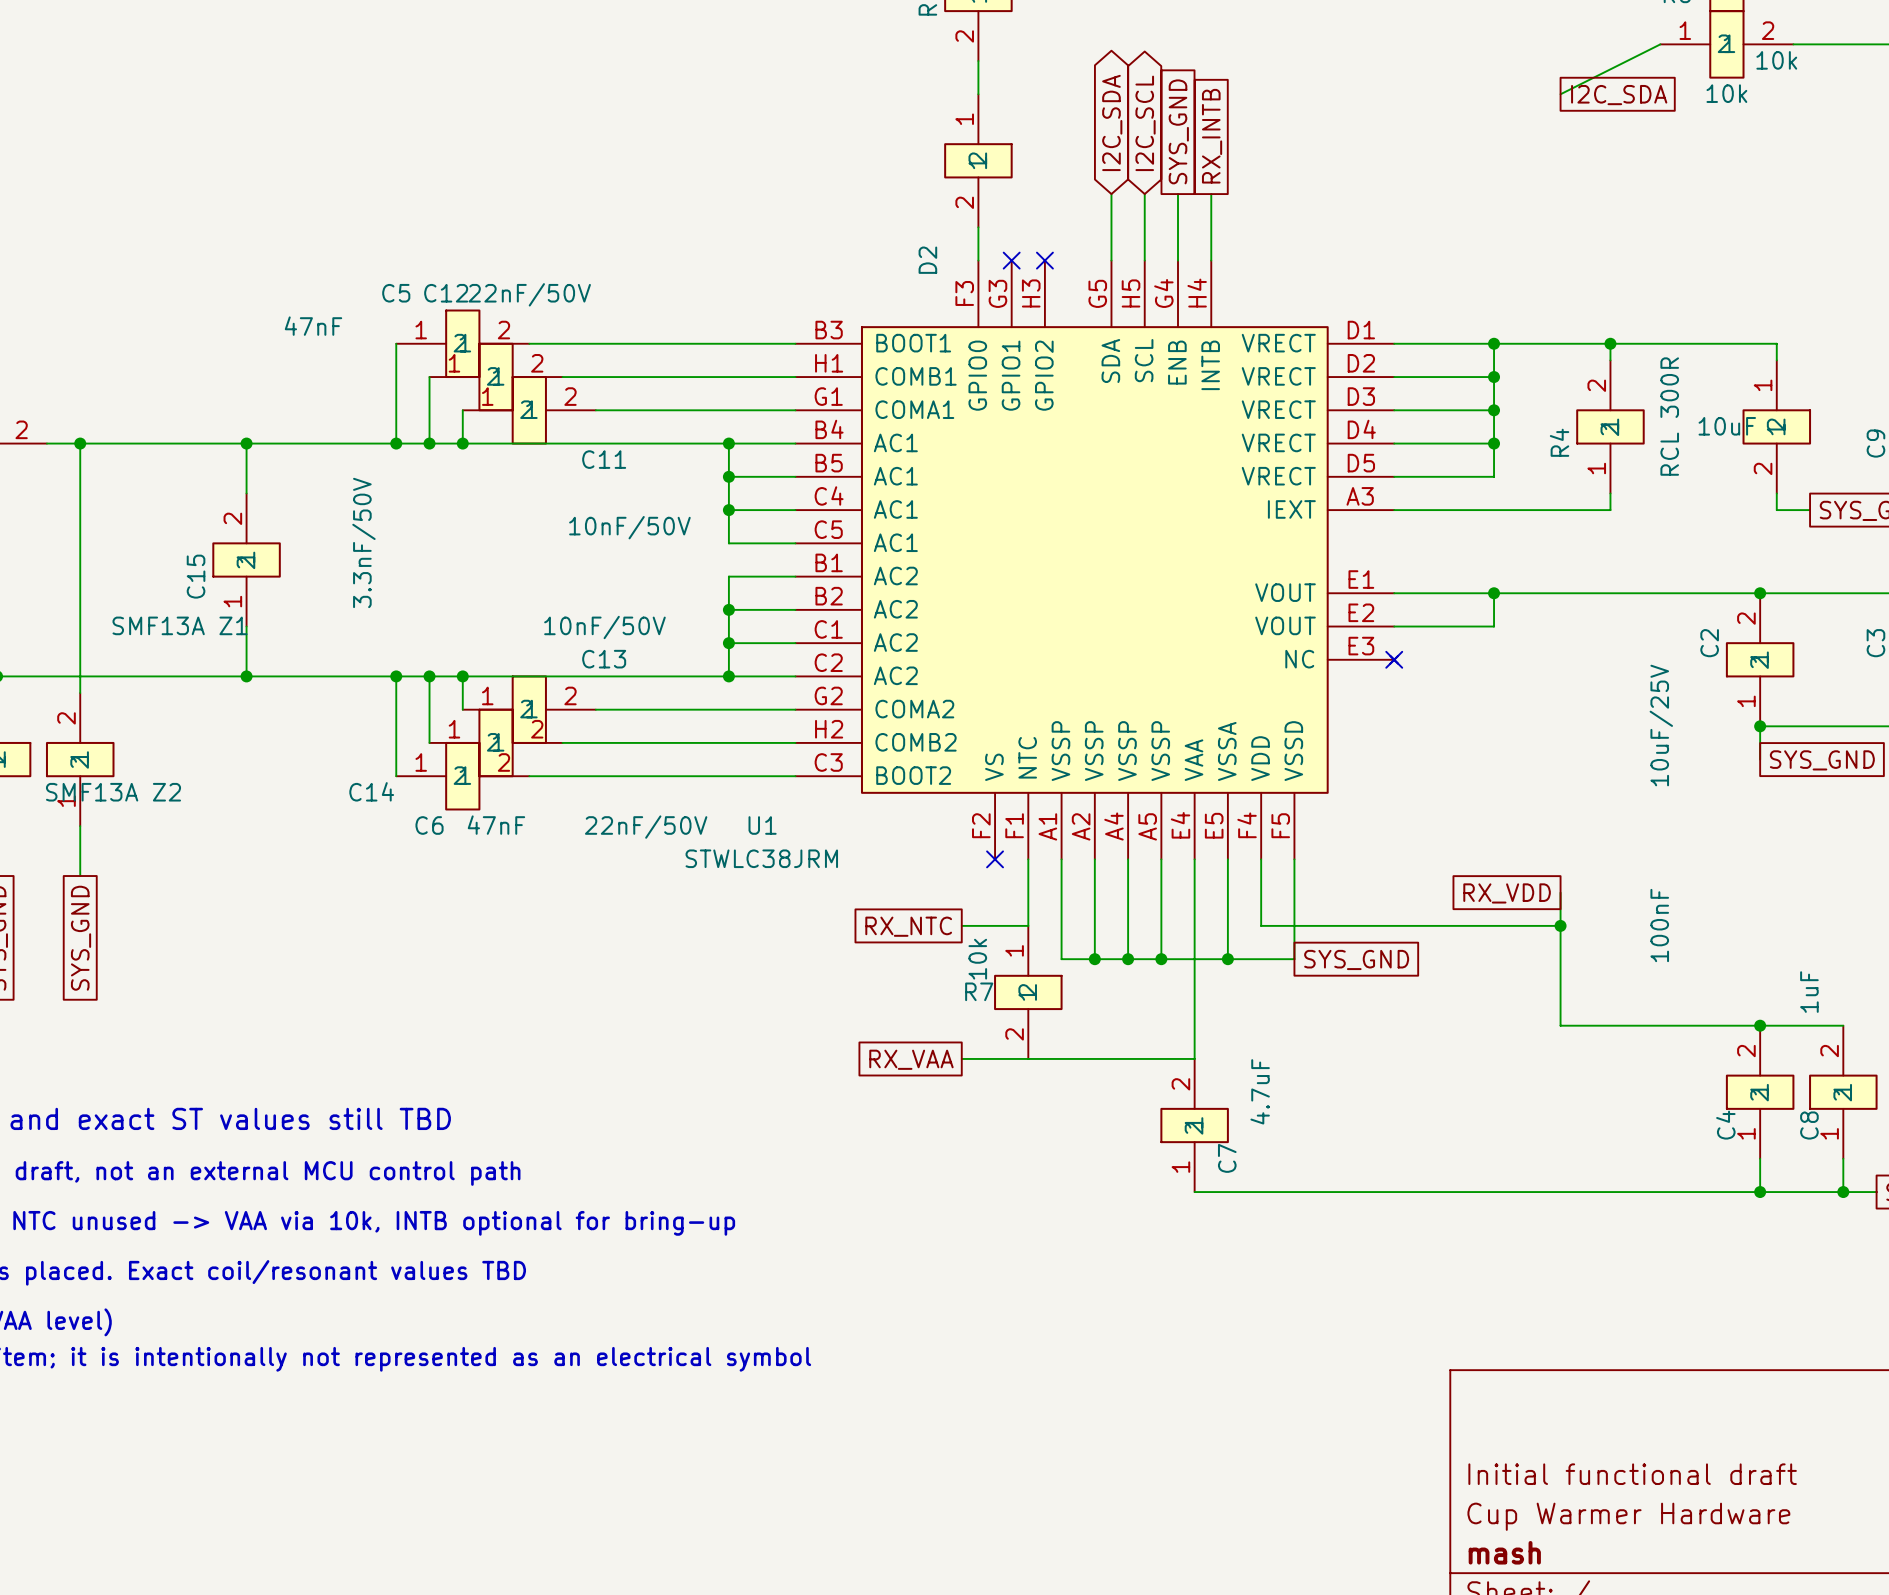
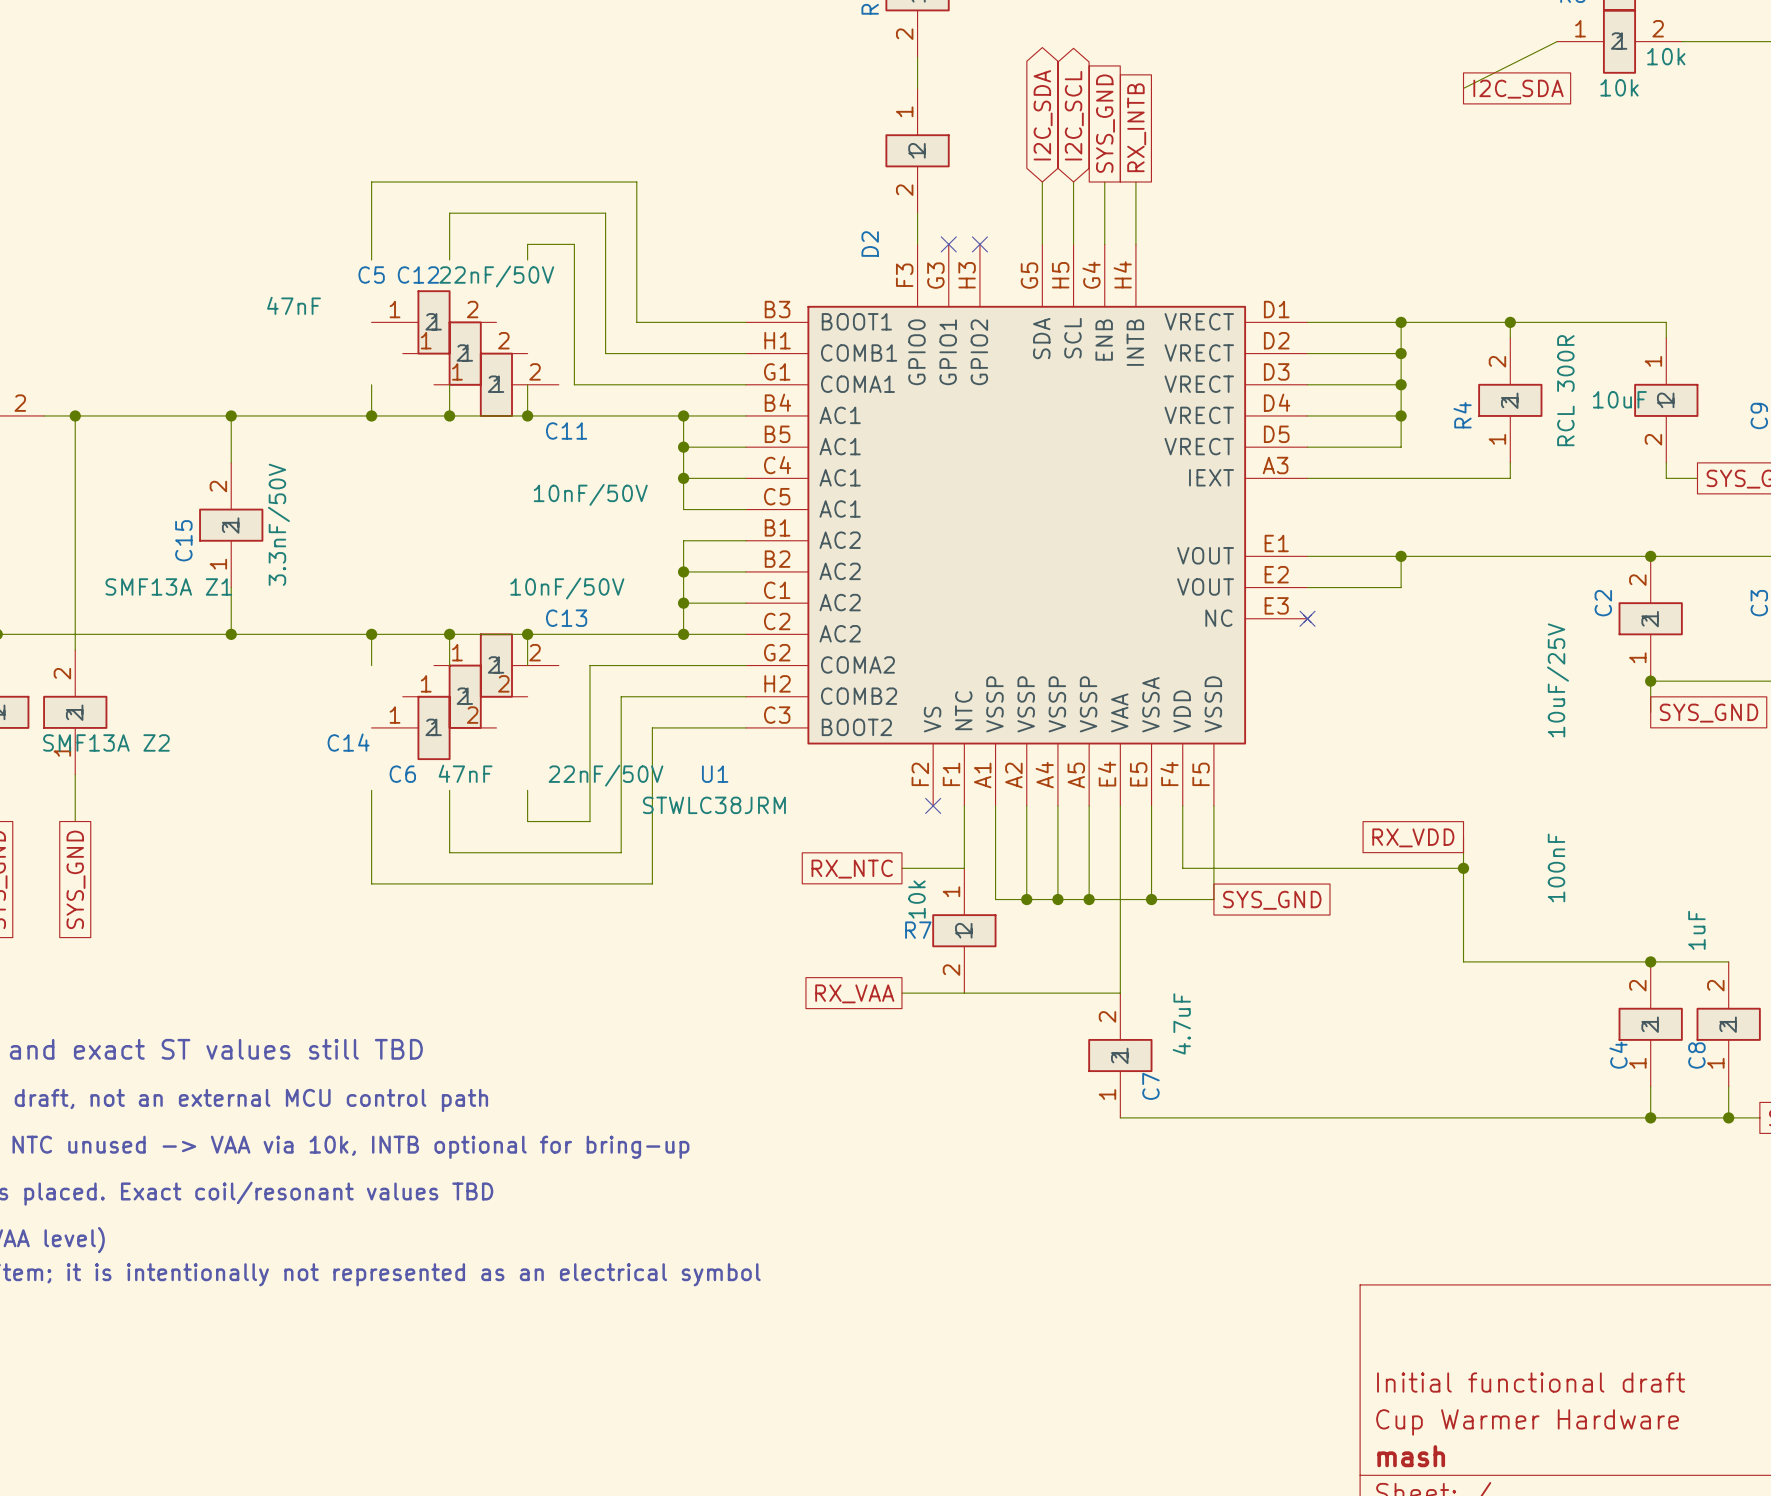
wire: (396, 343) (396, 410) -> none
wire: (529, 343) (679, 343) -> (371, 259) (371, 182) (636, 182) (636, 322)
wire: (429, 377) (429, 443) -> none
wire: (562, 377) (645, 377) -> (449, 259) (449, 213) (605, 213) (605, 353)
wire: (462, 410) (462, 443) -> (449, 384) (449, 415)
wire: none -> (527, 384) (527, 415)
wire: (595, 410) (612, 410) -> (527, 259) (527, 244) (574, 244) (574, 384)
junction: (429, 443) -> none
junction position: (462, 443) -> (449, 415)
junction: none -> (527, 415)
C15 value position: 3.3nF/50V (363, 542) -> 3.3nF/50V (278, 524)
wire: (429, 676) (429, 742) -> none
junction: (429, 676) -> none
wire: (462, 676) (462, 709) -> (449, 634) (449, 665)
junction position: (462, 676) -> (449, 634)
wire: none -> (527, 634) (527, 665)
junction: none -> (527, 634)
wire: (396, 709) (396, 776) -> none
wire: (595, 709) (629, 709) -> (527, 790) (527, 821) (589, 821) (589, 665)
wire: (562, 742) (662, 742) -> (449, 790) (449, 852) (621, 852) (621, 696)
wire: (529, 776) (695, 776) -> (371, 790) (371, 883) (652, 883) (652, 727)

